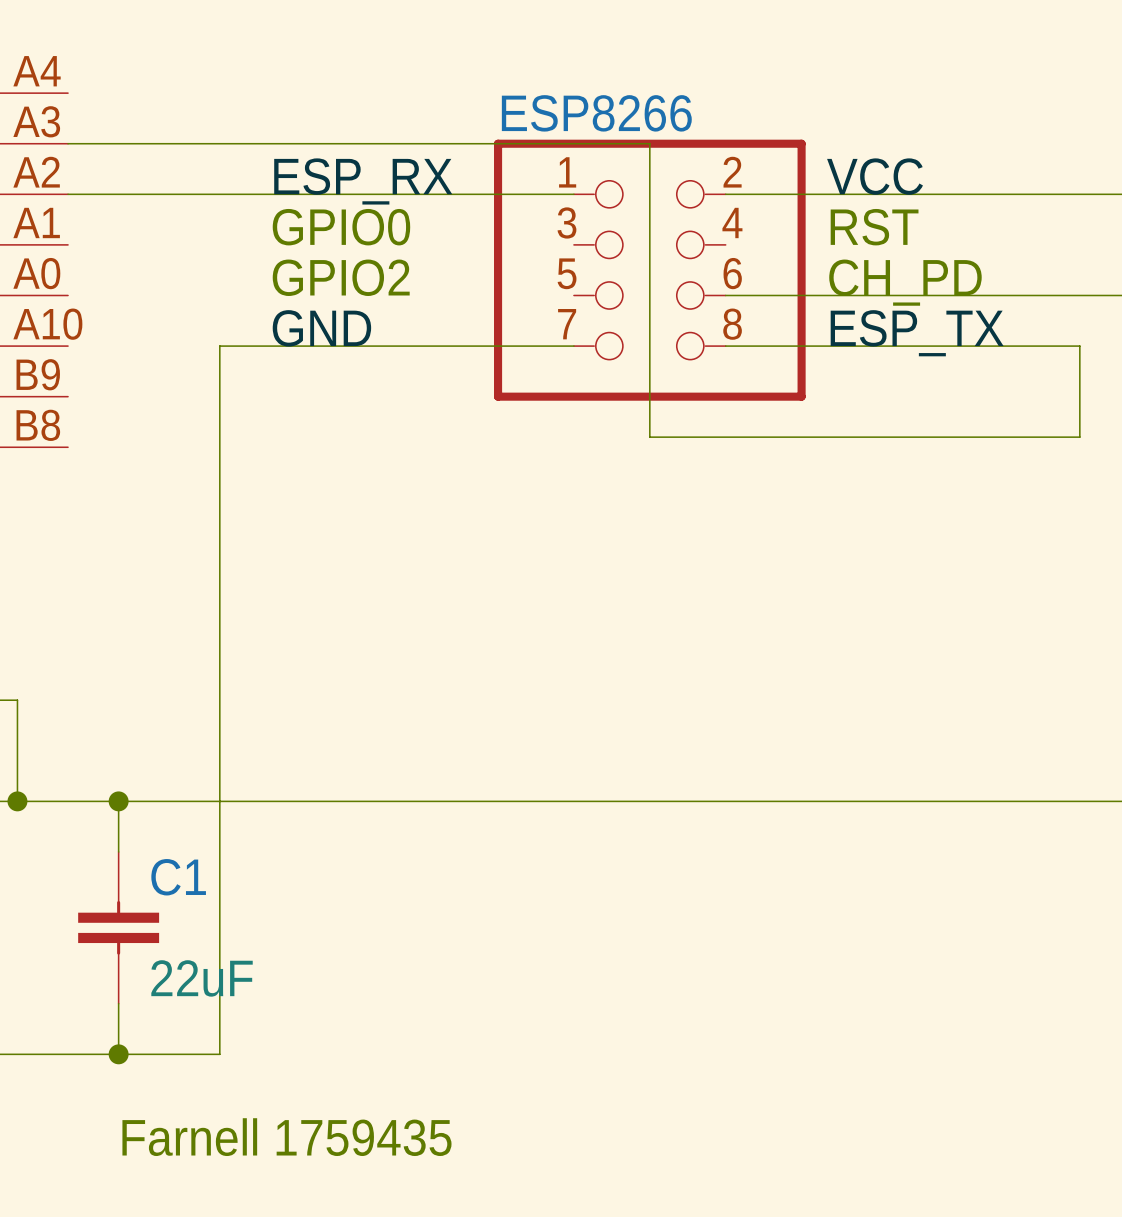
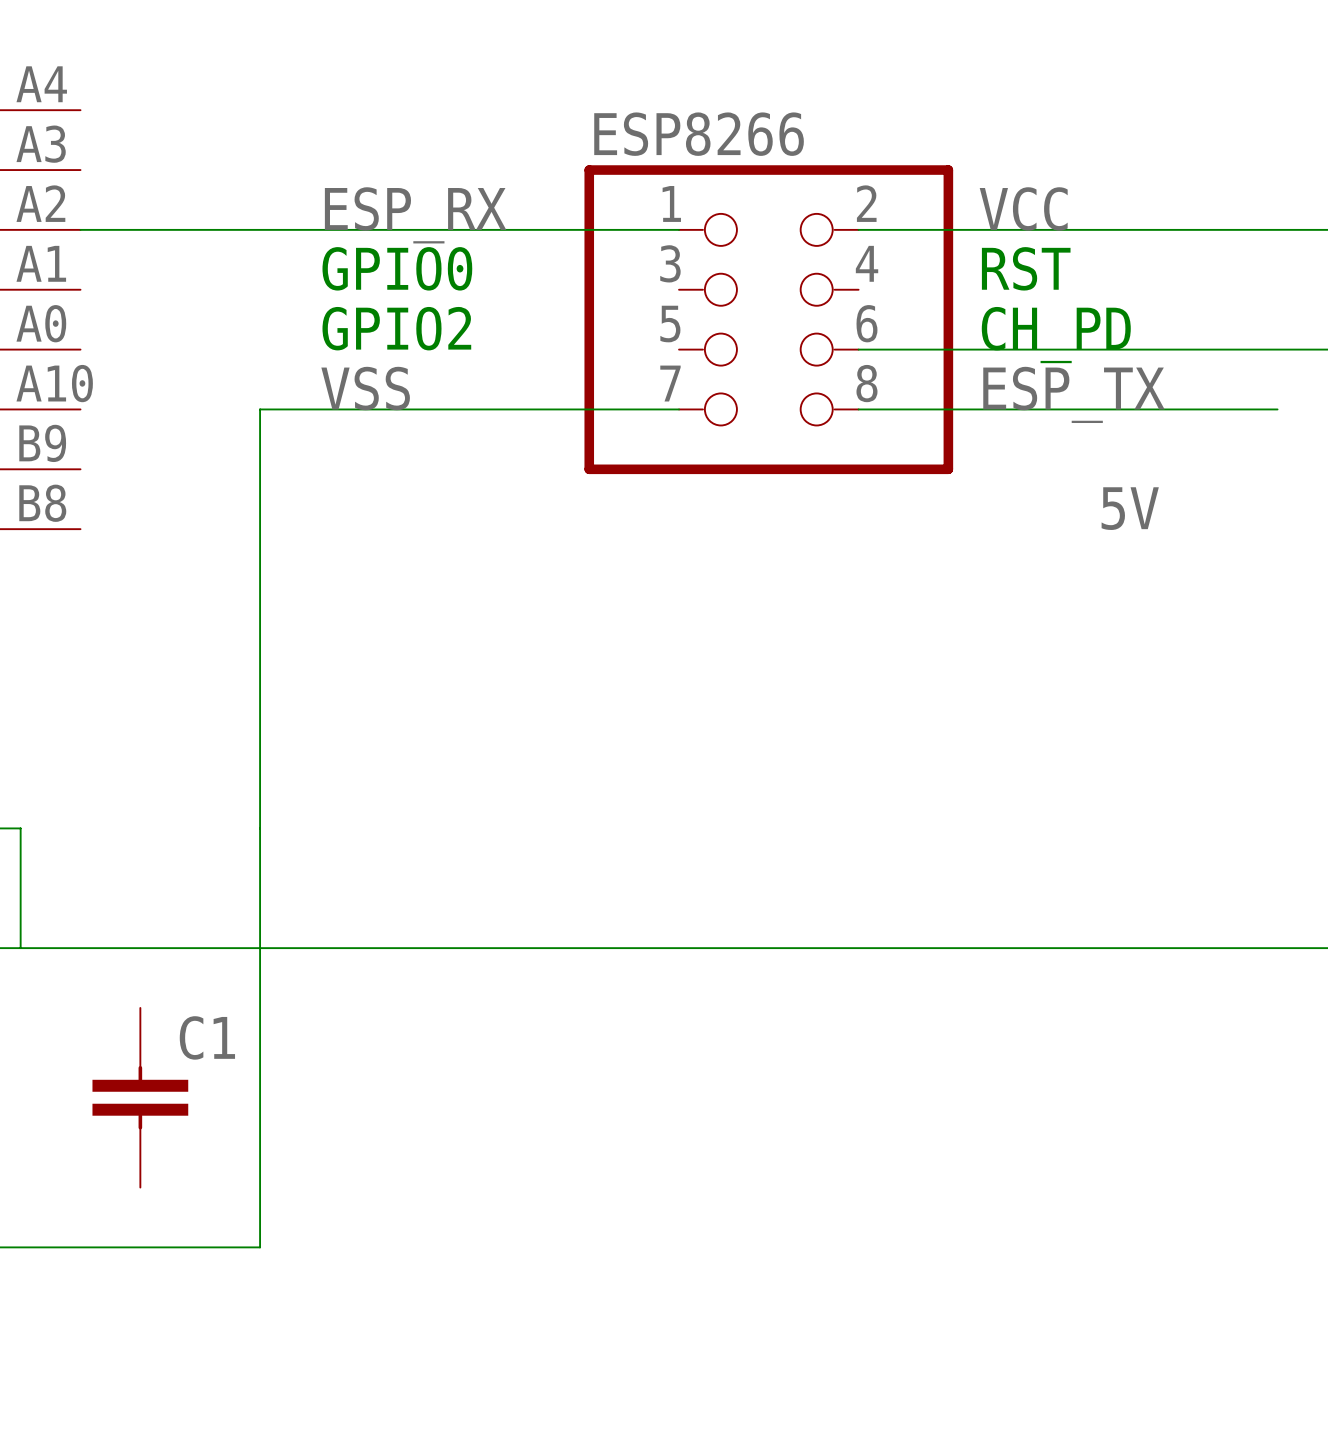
wire: (68, 143) (649, 143) (649, 437) (1079, 437) (1079, 346) -> none
label: GND (321, 328) -> VSS (365, 388)
label: none -> 5V (1130, 508)
junction: (17, 801) -> none
wire: (118, 801) (118, 851) -> none
junction: (118, 801) -> none
C1 value: 22uF (202, 978) -> none
wire: (118, 1003) (118, 1054) -> none
junction: (118, 1054) -> none
text: Farnell 1759435 (286, 1137) -> none

